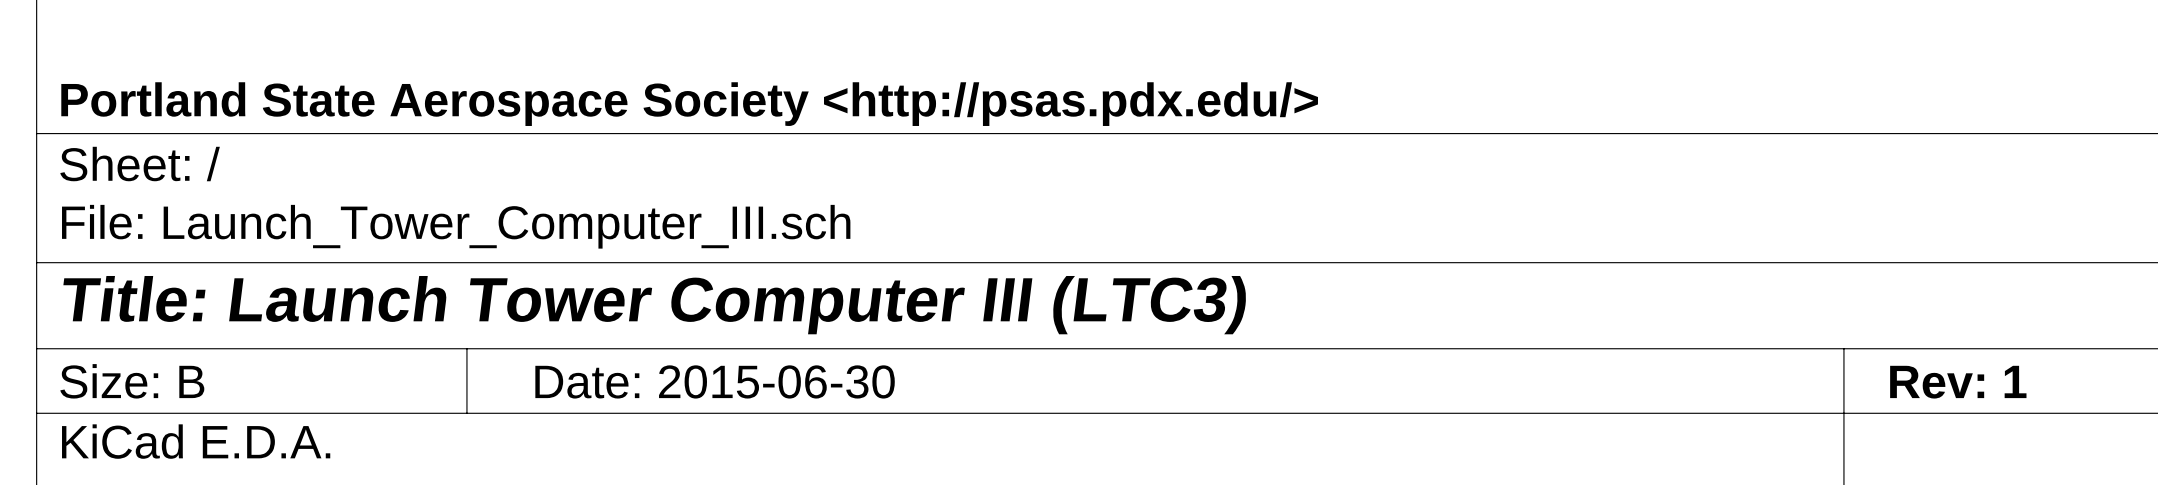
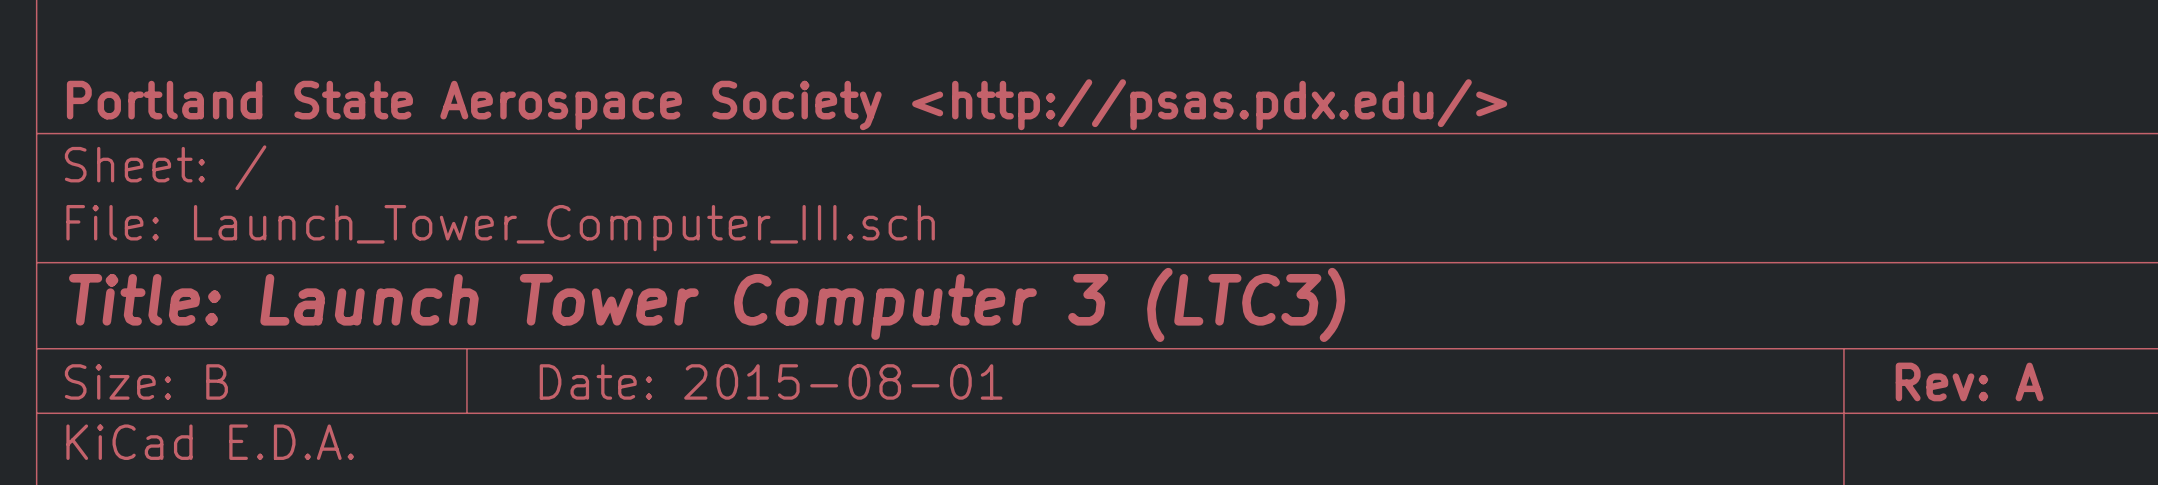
title block: Title: Launch Tower Computer III (LTC3) (654, 305) -> Title: Launch Tower Computer 3 (LTC3) (707, 304)
title block: Date: 2015-06-30 (715, 381) -> Date: 2015-08-01 (771, 381)
title block: Rev: 1 (1958, 382) -> Rev: A (1969, 381)

